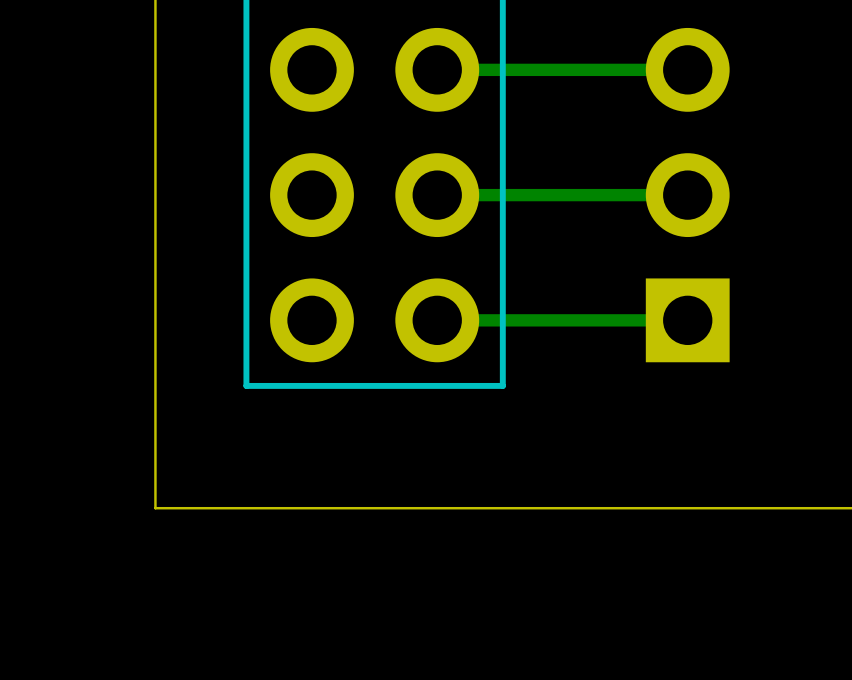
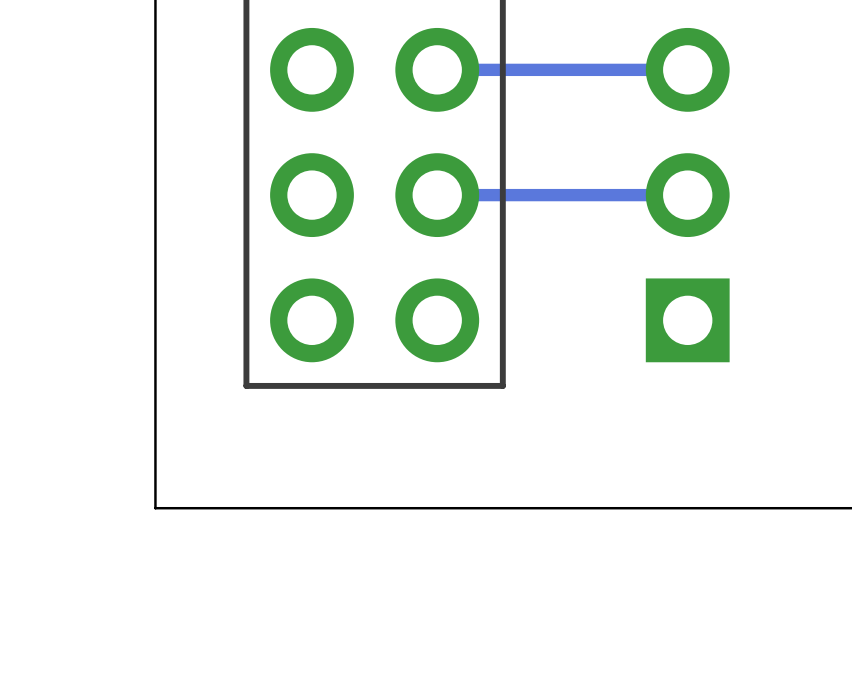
track: (687, 320) (437, 320) -> none

